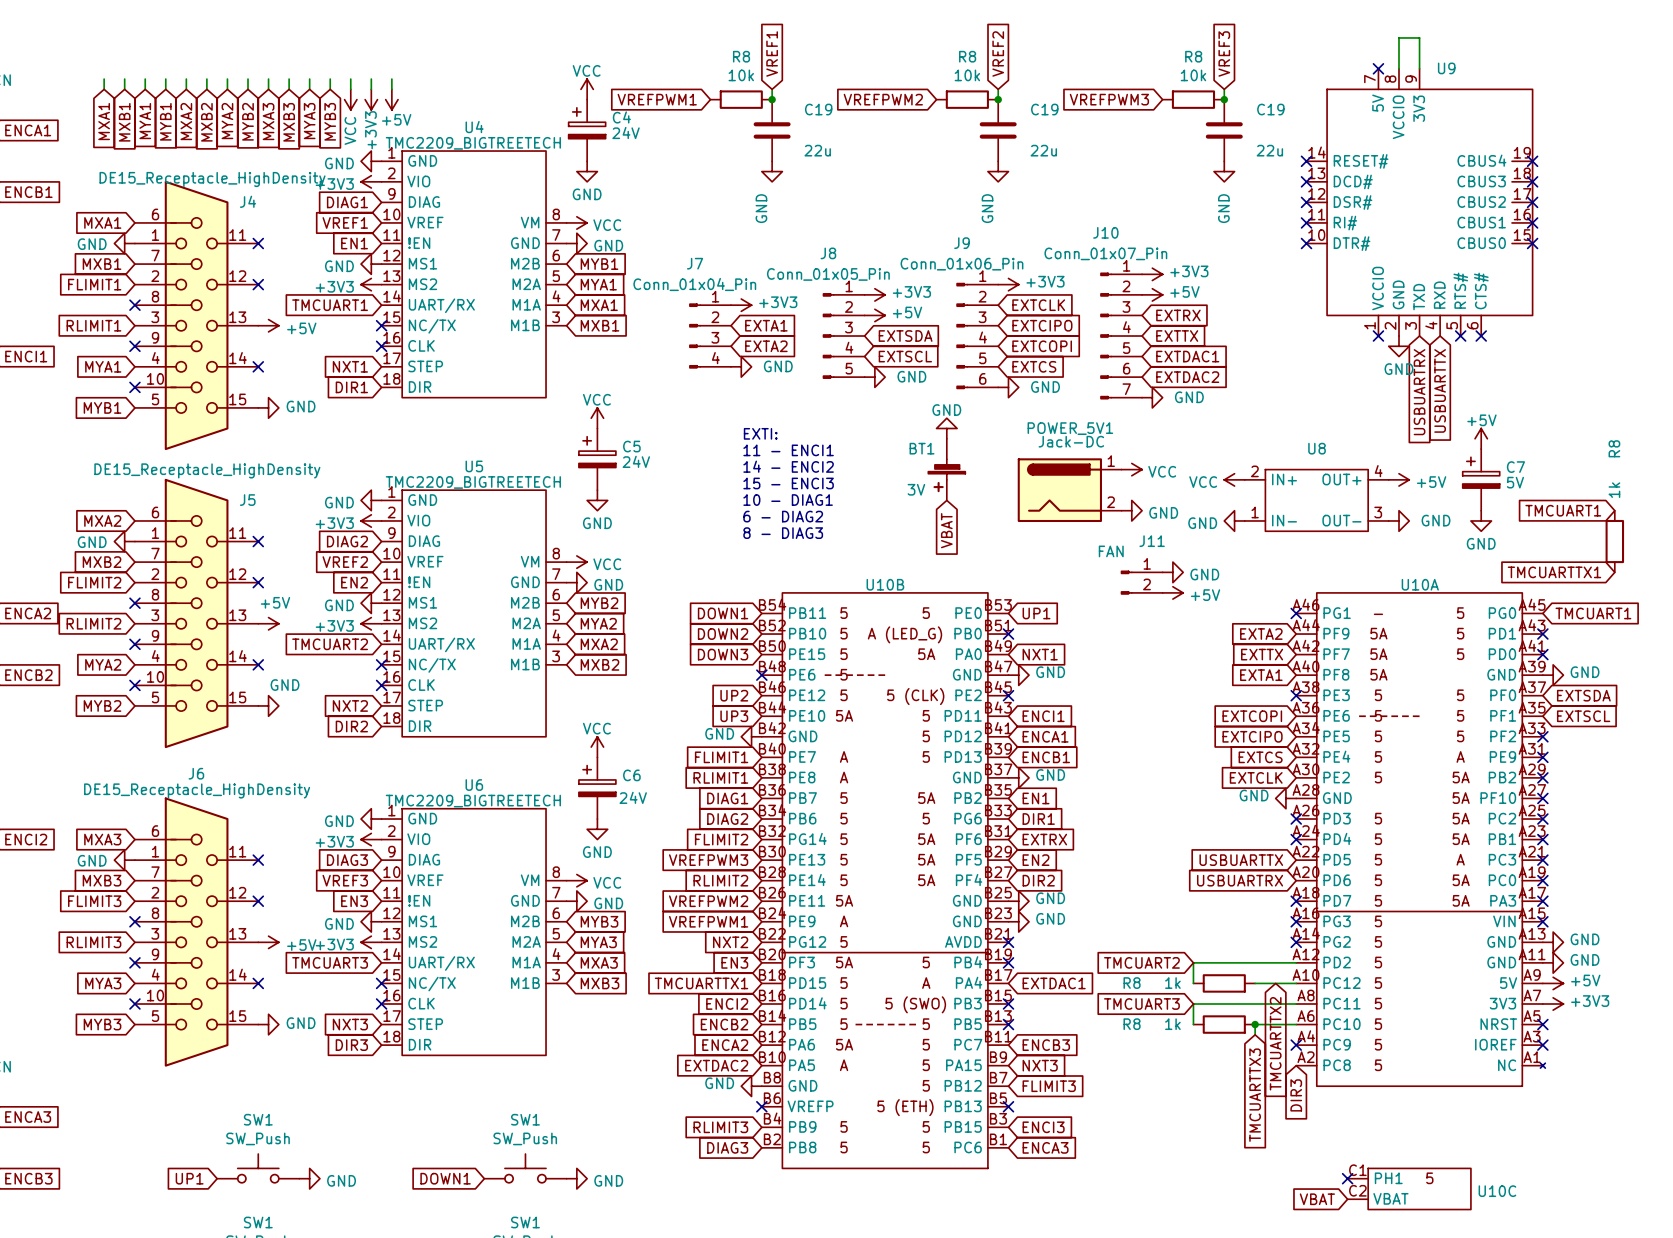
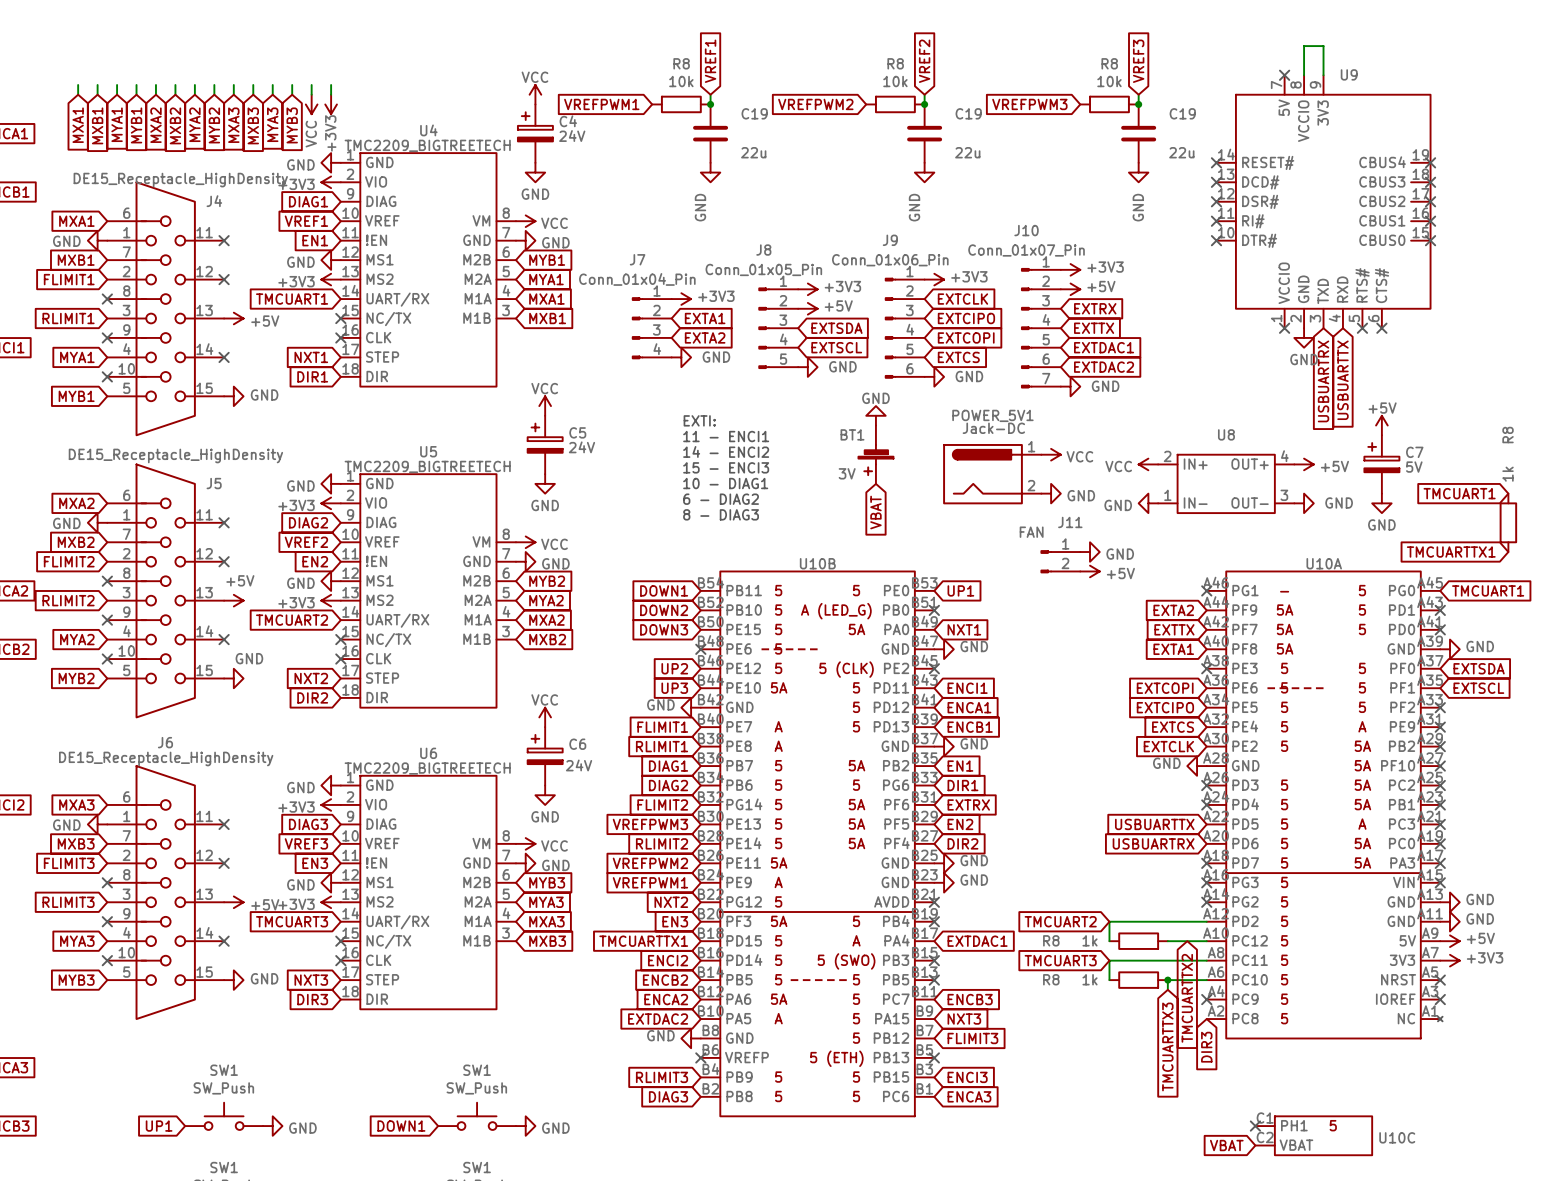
wire: (391, 79) (391, 89) -> none
power symbol: +5V (391, 99) -> none

